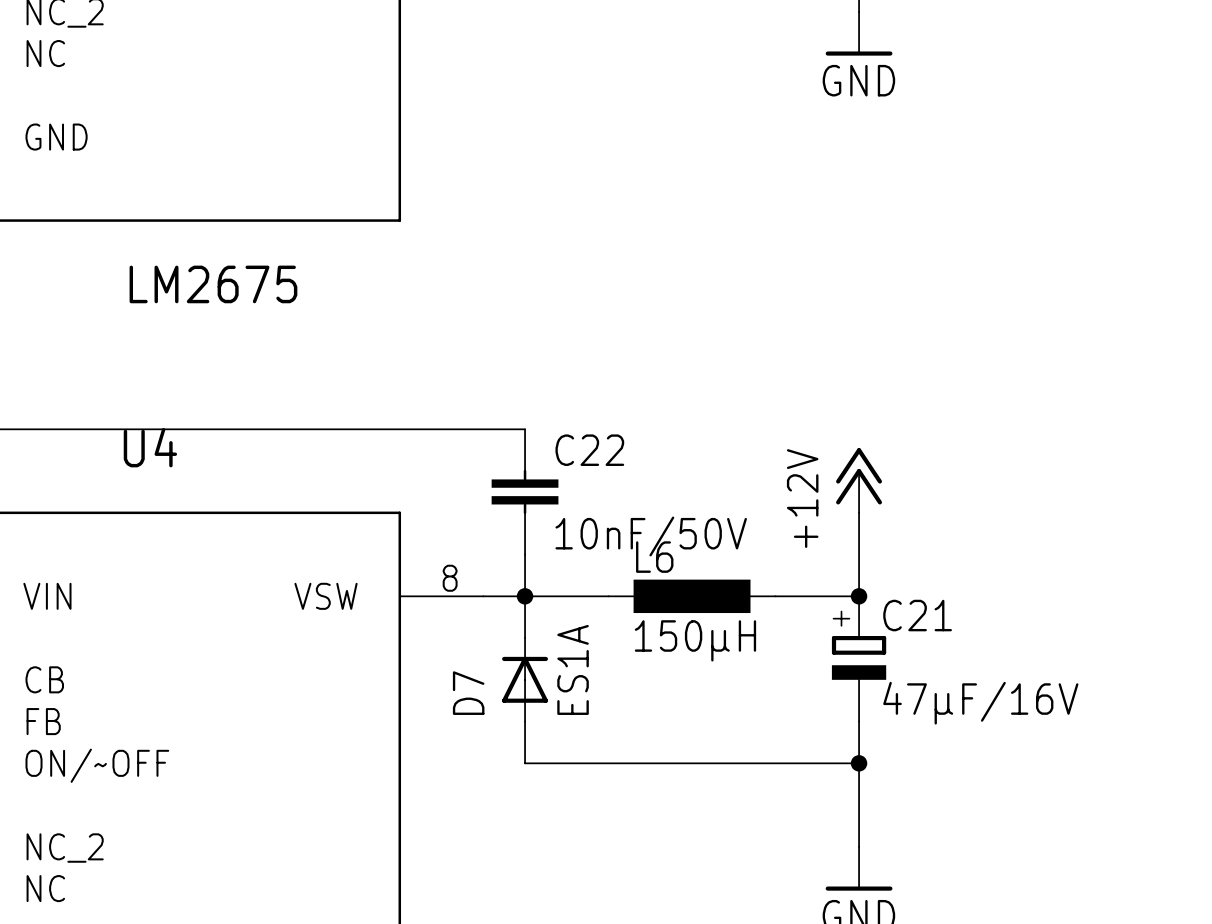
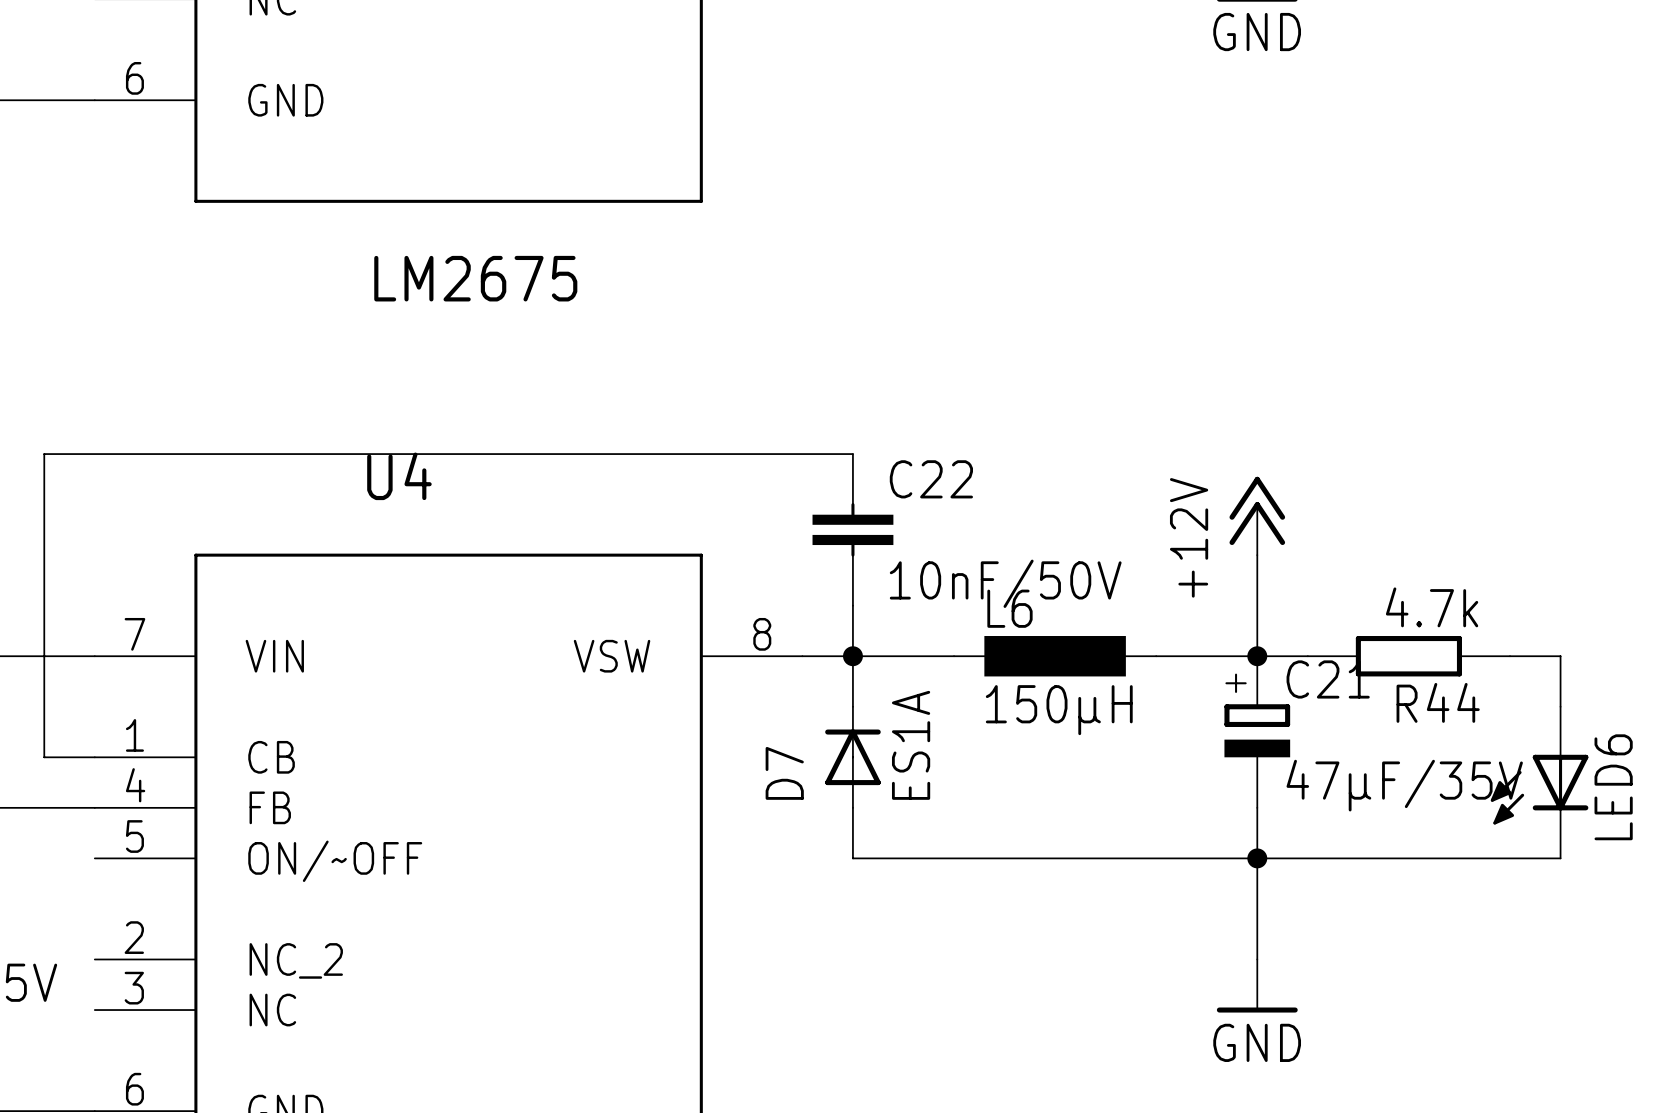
wire: none -> (1257, 656) (1307, 656)
R44: none -> 4.7k (1408, 656)
wire: none -> (1510, 656) (1560, 656) (1560, 706)
LED6: none -> (1539, 782)
C21 value: 47µF/16V (980, 703) -> 47µF/35V (1404, 785)
wire: none -> (1257, 858) (1560, 858)

